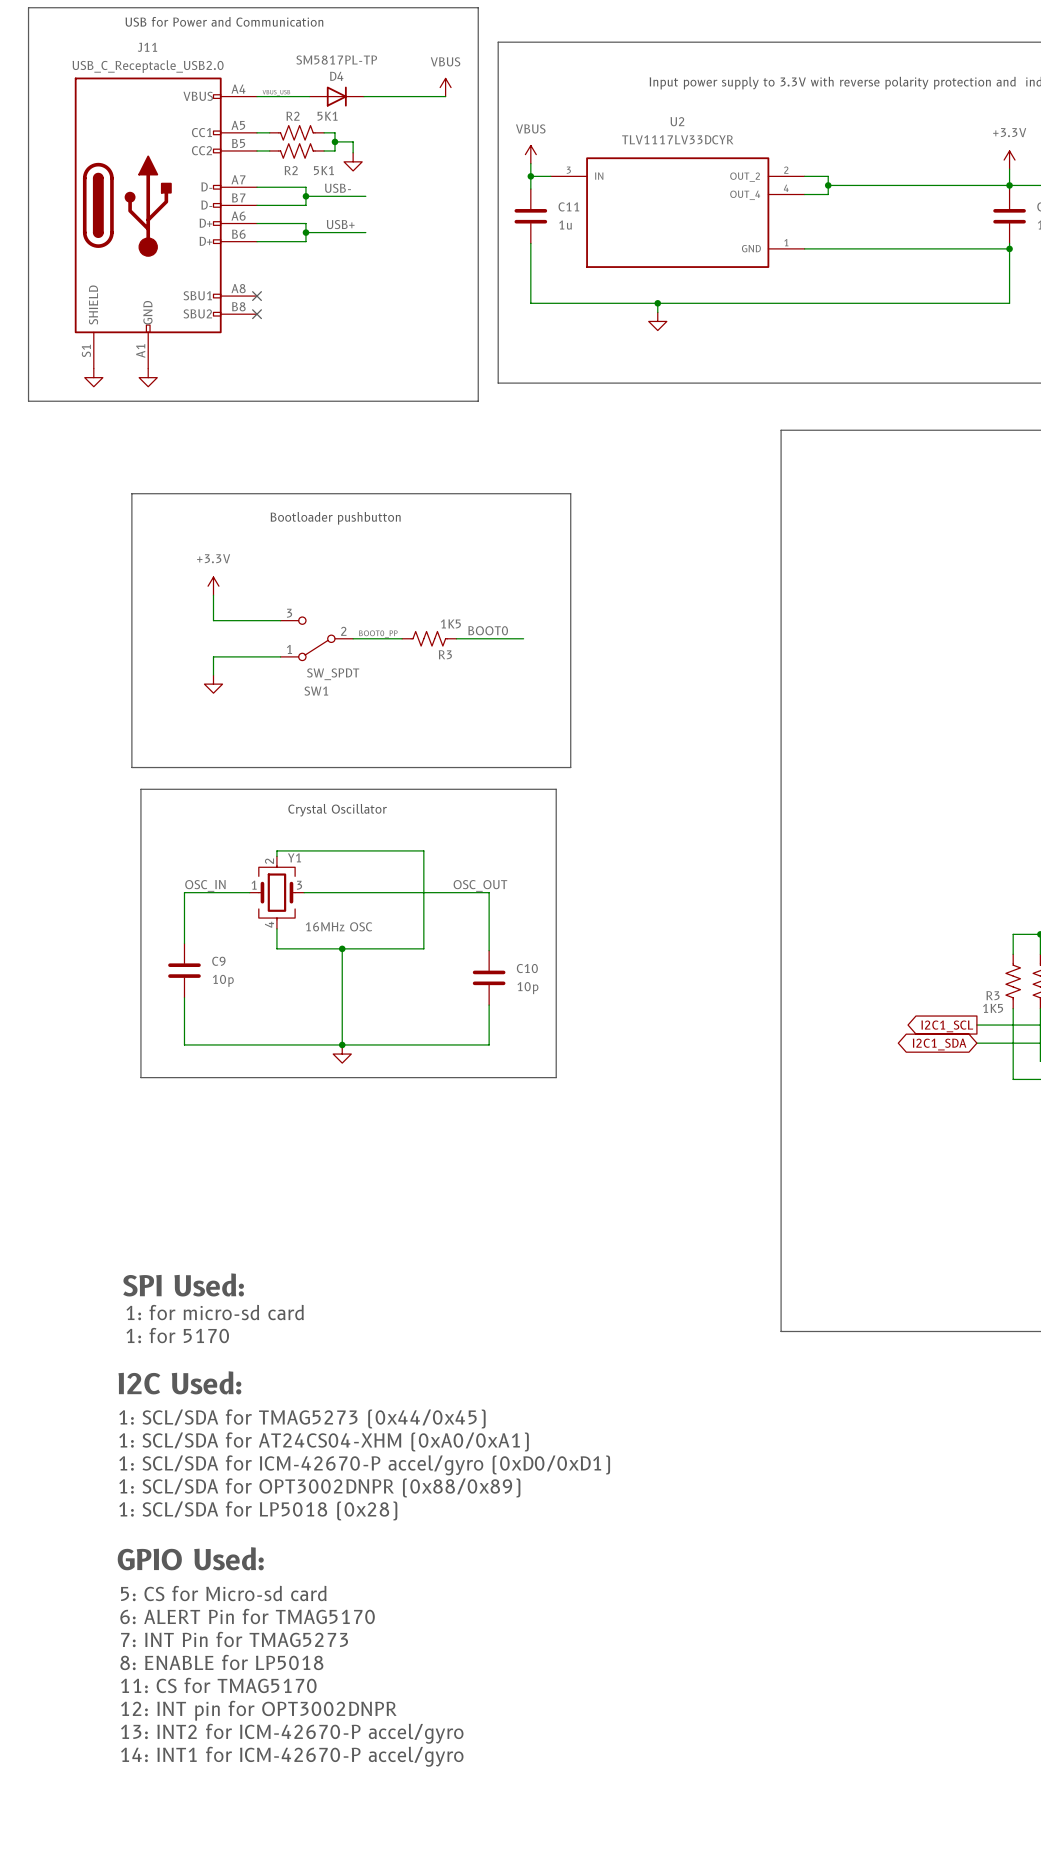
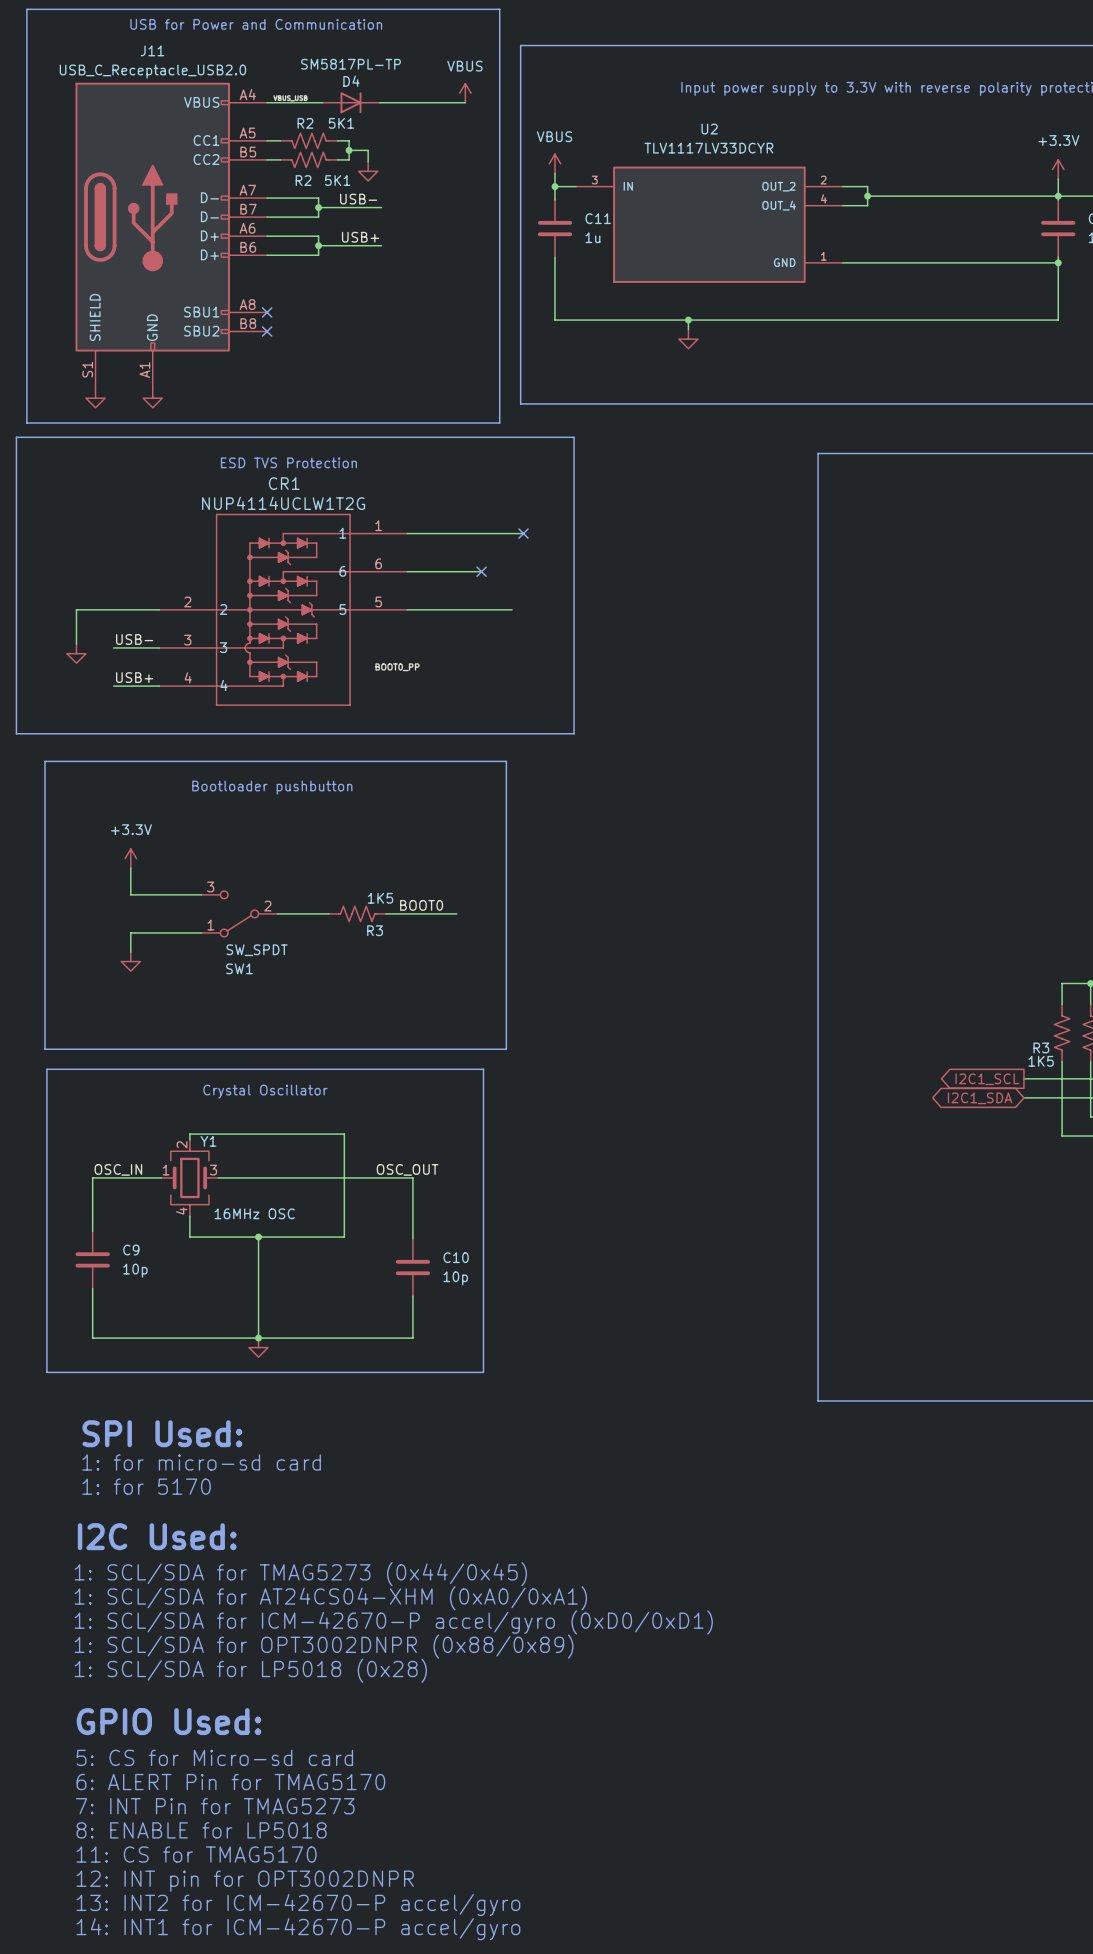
line: none -> (16, 437) (574, 437) (574, 733) (16, 733) (16, 437)
text: none -> ESD TVS Protection (288, 462)
line: (131, 493) (570, 493) (570, 767) (131, 767) (131, 493) -> none
wire: none -> (407, 533) (523, 533)
no-connect mark: none -> (523, 533)
text: Bootloader pushbutton (335, 518) -> none
wire: none -> (407, 571) (481, 571)
no-connect mark: none -> (481, 571)
wire: none -> (159, 609) (76, 609) (76, 644)
CR1: none -> NUP4114UCLW1T2G (283, 609)
wire: none -> (407, 609) (512, 609)
power symbol: +3.3V (213, 586) -> none
wire: (213, 595) (213, 620) (280, 620) -> none
label: none -> USB- (134, 639)
wire: none -> (113, 647) (159, 647)
power symbol: none -> (76, 653)
label: BOOT0 (488, 630) -> none
SW1 position: (316, 638) -> (239, 913)
wire: (353, 638) (402, 638) -> none
R3: 1K5 (429, 638) -> none
wire: (456, 638) (523, 638) -> none
label: none -> USB+ (134, 677)
wire: none -> (113, 686) (159, 686)
wire: (280, 656) (213, 656) (213, 675) -> none
power symbol: (213, 684) -> none
line: none -> (45, 761) (506, 761) (506, 1049) (45, 1049) (45, 761)
text: none -> Bootloader pushbutton (272, 787)
line: (140, 789) (556, 789) (556, 1077) (140, 1077) (140, 789) -> none
text: Crystal Oscillator (337, 810) -> none
power symbol: none -> +3.3V (130, 858)
wire: none -> (130, 868) (130, 894) (201, 894)
wire: (276, 856) (276, 850) (423, 850) (423, 948) (276, 948) (276, 928) -> none
label: none -> BOOT0 (421, 905)
wire: none -> (277, 913) (329, 913)
R3: none -> 1K5 (357, 913)
wire: none -> (386, 913) (456, 913)
label: OSC_IN (205, 885) -> none
label: OSC_OUT (480, 885) -> none
wire: none -> (201, 932) (130, 932) (130, 952)
wire: (249, 892) (184, 892) (184, 943) -> none
Y1 position: (276, 892) -> (189, 1177)
wire: (304, 892) (489, 892) (489, 950) -> none
power symbol: none -> (130, 961)
wire: (342, 948) (342, 1044) -> none
junction: (342, 948) -> none
C9 position: (184, 970) -> (92, 1259)
C10 position: (489, 977) -> (412, 1267)
wire: (184, 997) (184, 1044) (489, 1044) (489, 1005) -> none
line: none -> (46, 1069) (483, 1069) (483, 1372) (46, 1372) (46, 1069)
text: none -> Crystal Oscillator (265, 1091)
junction: (342, 1044) -> none
power symbol: (342, 1054) -> none
wire: none -> (189, 1139) (189, 1134) (344, 1134) (344, 1237) (189, 1237) (189, 1216)
label: none -> OSC_IN (118, 1169)
label: none -> OSC_OUT (407, 1169)
wire: none -> (161, 1177) (92, 1177) (92, 1231)
wire: none -> (218, 1177) (412, 1177) (412, 1238)
wire: none -> (258, 1237) (258, 1338)
junction: none -> (258, 1237)
wire: none -> (92, 1288) (92, 1338) (412, 1338) (412, 1296)
junction: none -> (258, 1338)
power symbol: none -> (258, 1347)
text position: SPI Used: (183, 1284) -> SPI Used: (162, 1433)
text position: 1: for micro-sd card (215, 1312) -> 1: for micro-sd card (201, 1462)
text position: 1: for 5170 (177, 1335) -> 1: for 5170 (146, 1486)
text position: I2C Used: (179, 1382) -> I2C Used: (157, 1536)
text position: 1: SCL/SDA for TMAG5273 (0x44/0x45) (302, 1418) -> 1: SCL/SDA for TMAG5273 (0x44/0x45) (300, 1574)
text position: 1: SCL/SDA for AT24CS04-XHM (0xA0/0xA1) (324, 1441) -> 1: SCL/SDA for AT24CS04-XHM (0xA0/0xA1) (330, 1598)
text position: 1: SCL/SDA for ICM-42670-P accel/gyro (0xD0/0xD1) (364, 1465) -> 1: SCL/SDA for ICM-42670-P accel/gyro (0xD0/0xD1) (393, 1622)
text position: 1: SCL/SDA for OPT3002DNPR (0x88/0x89) (319, 1487) -> 1: SCL/SDA for OPT3002DNPR (0x88/0x89) (324, 1646)
text position: 1: SCL/SDA for LP5018 (0x28) (258, 1510) -> 1: SCL/SDA for LP5018 (0x28) (250, 1670)
text position: GPIO Used: (190, 1558) -> GPIO Used: (169, 1721)
text position: 5: CS for Micro-sd card (223, 1593) -> 5: CS for Micro-sd card (214, 1757)
text position: 6: ALERT Pin for TMAG5170 (247, 1616) -> 6: ALERT Pin for TMAG5170 (230, 1782)
text position: 7: INT Pin for TMAG5273 (234, 1639) -> 7: INT Pin for TMAG5273 (215, 1806)
text position: 8: ENABLE for LP5018 (221, 1662) -> 8: ENABLE for LP5018 (201, 1830)
text position: 11: CS for TMAG5170 (218, 1685) -> 11: CS for TMAG5170 (196, 1854)
text position: 12: INT pin for OPT3002DNPR (258, 1710) -> 12: INT pin for OPT3002DNPR (245, 1881)
text position: 13: INT2 for ICM-42670-P accel/gyro (292, 1733) -> 13: INT2 for ICM-42670-P accel/gyro (298, 1905)
text position: 14: INT1 for ICM-42670-P accel/gyro (292, 1756) -> 14: INT1 for ICM-42670-P accel/gyro (298, 1929)

